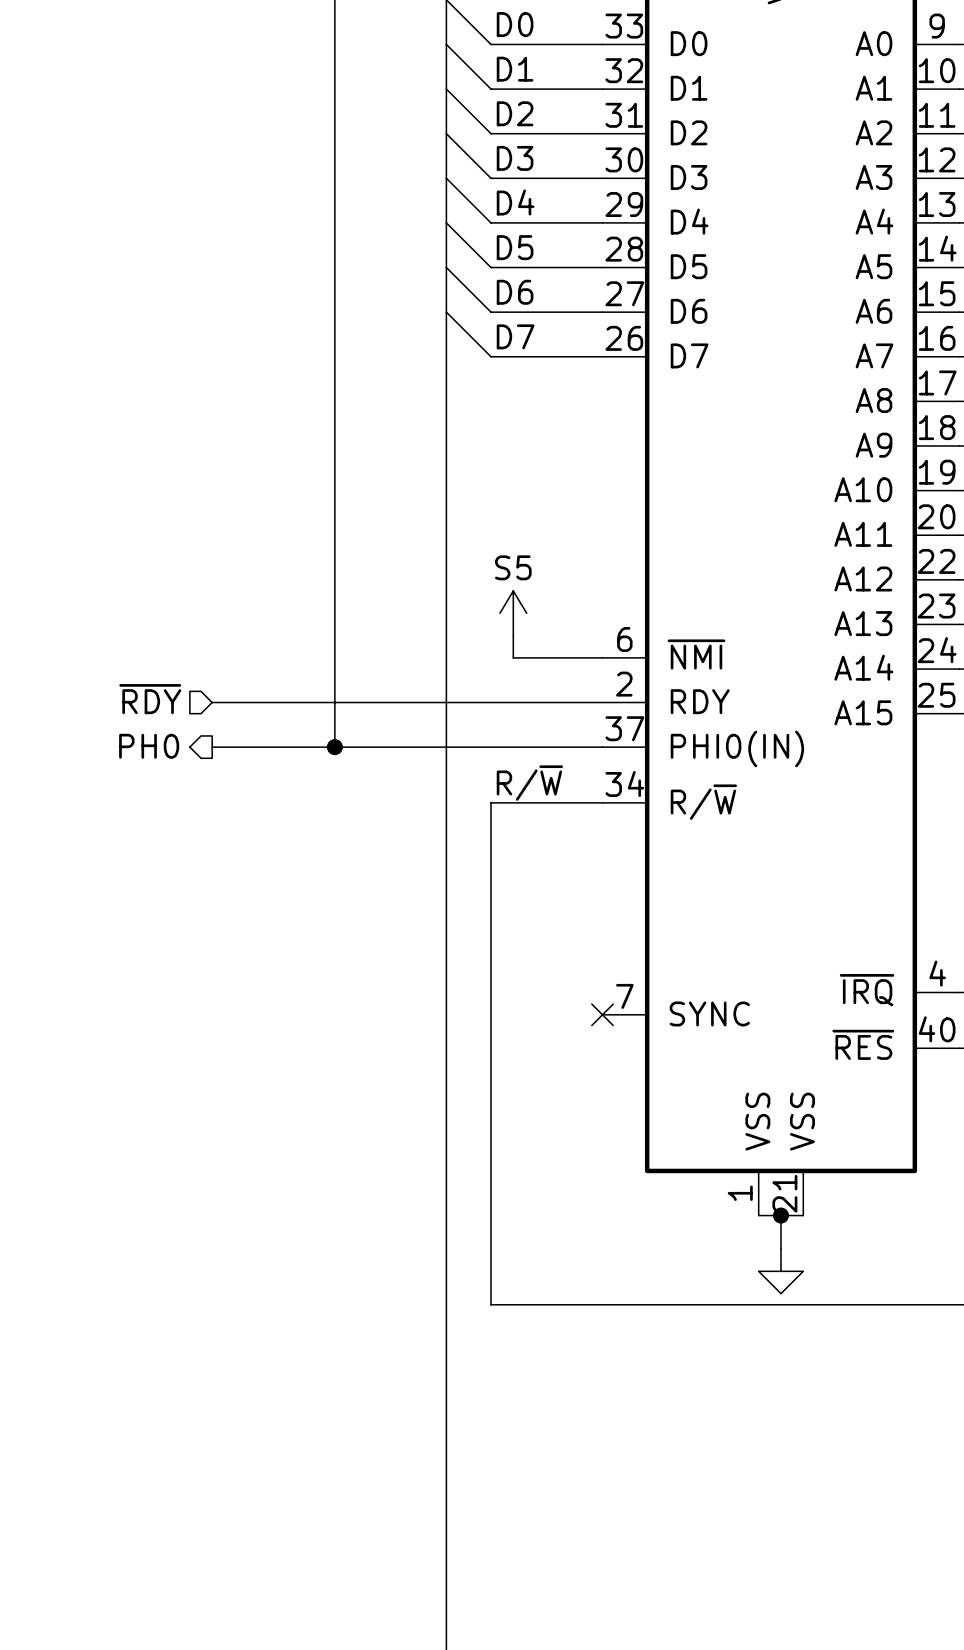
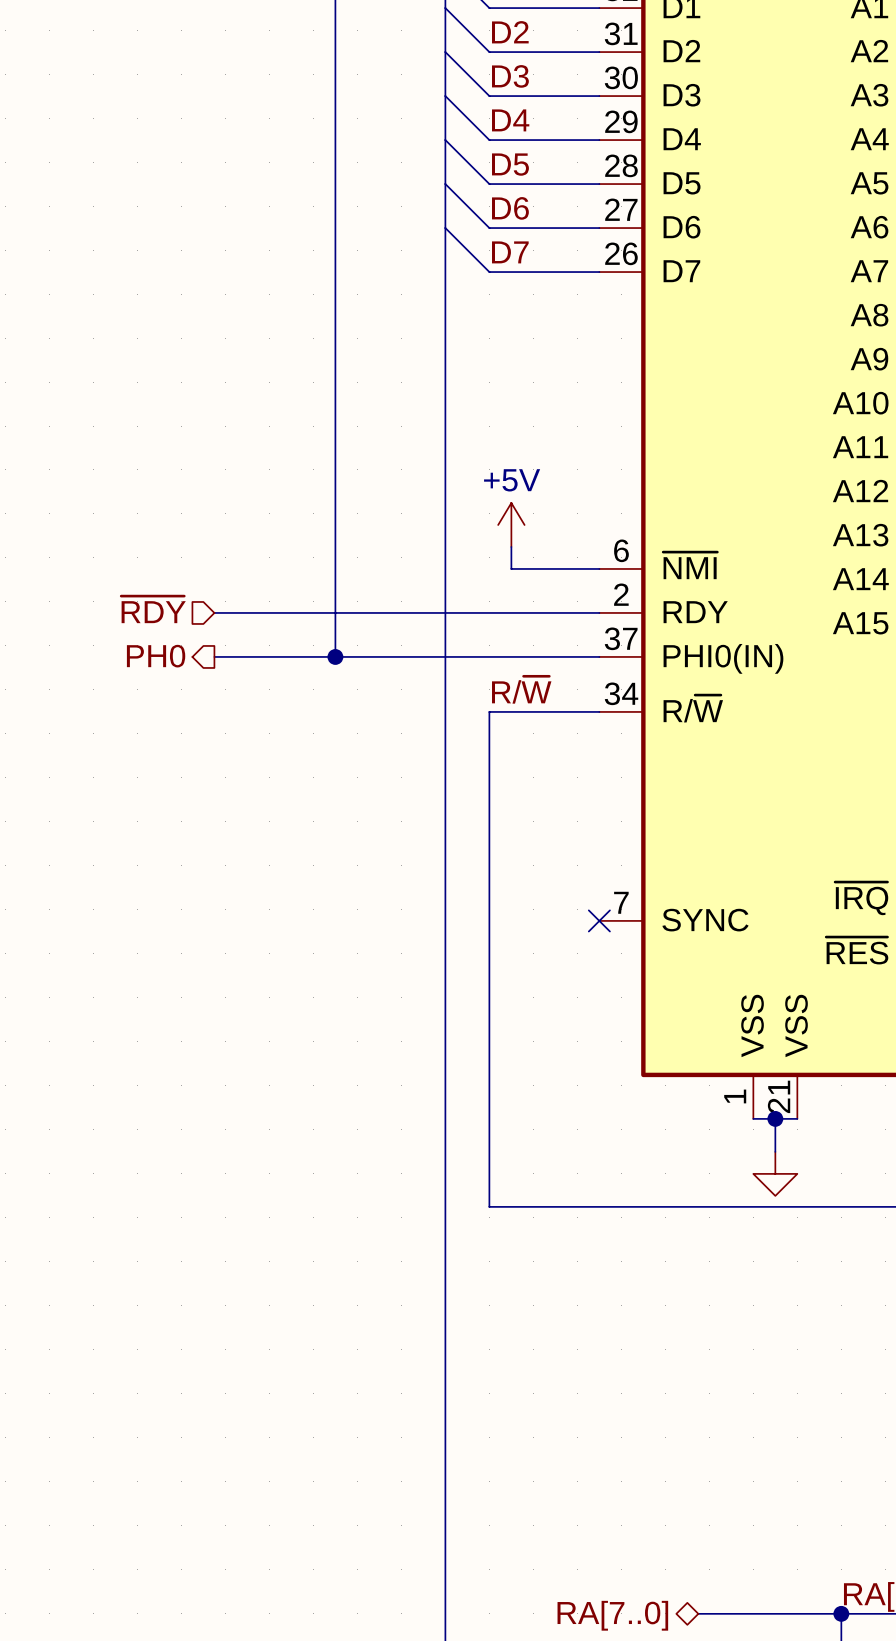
power symbol: S5 (513, 613) -> +5V (511, 524)

